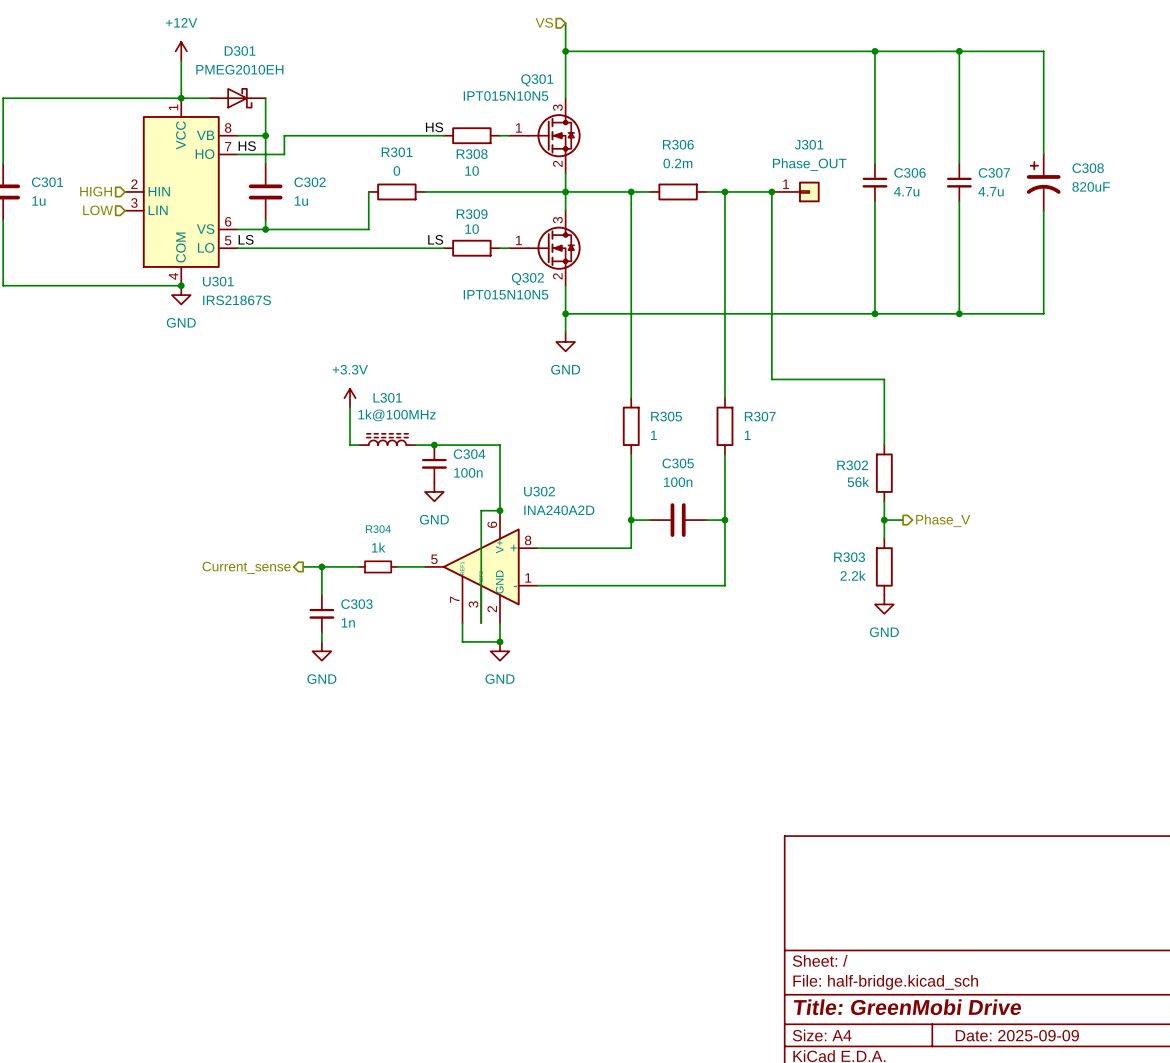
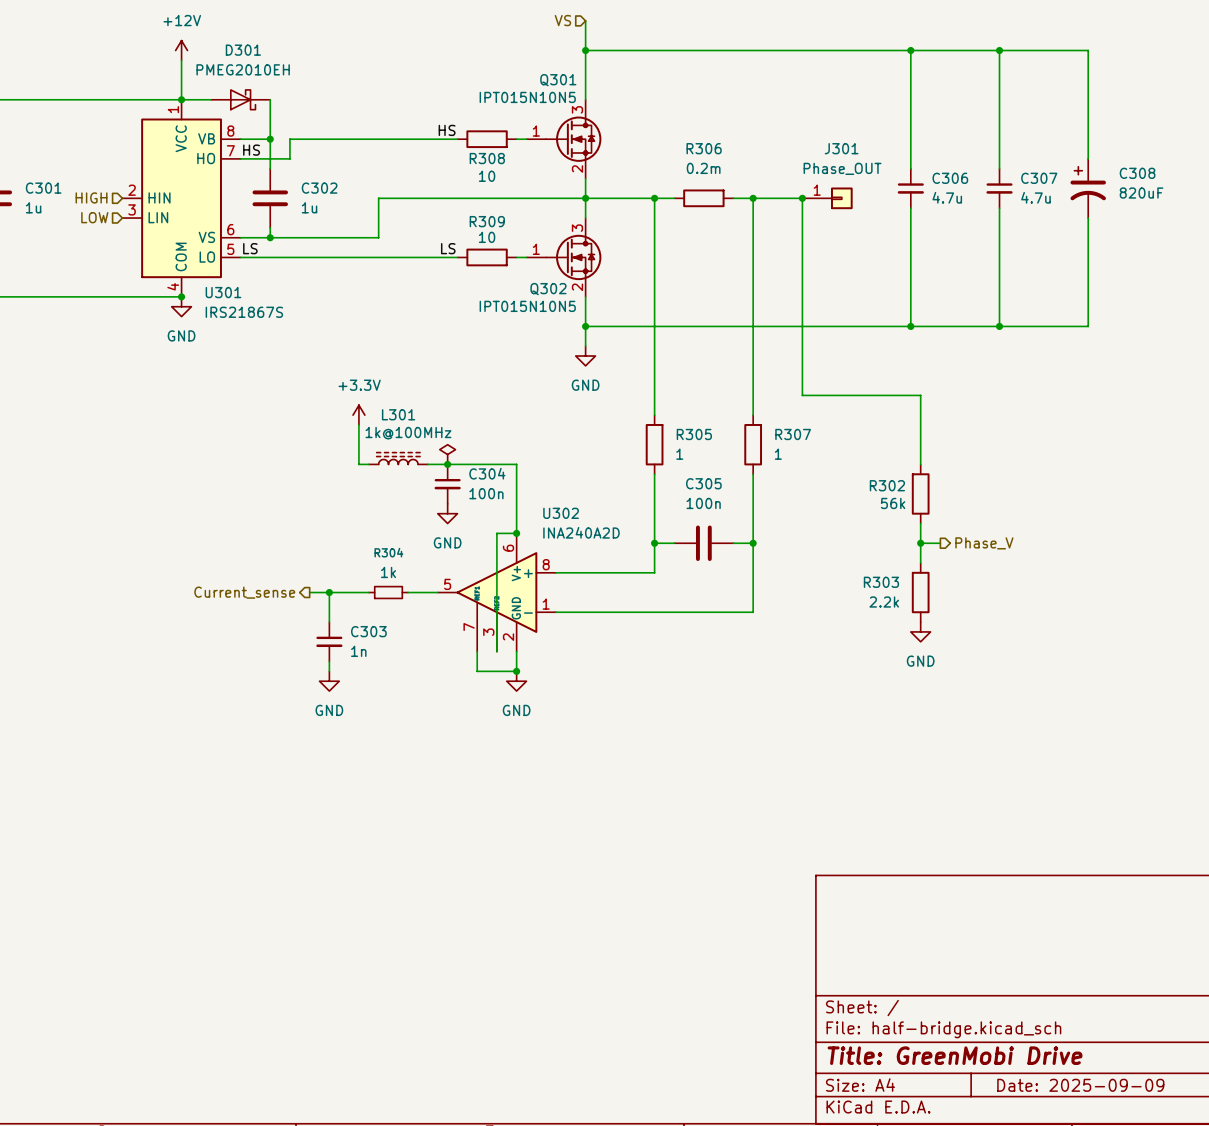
wire: none -> (378, 198) (437, 198)
R301: 0 (396, 191) -> none
power symbol: none -> (447, 454)

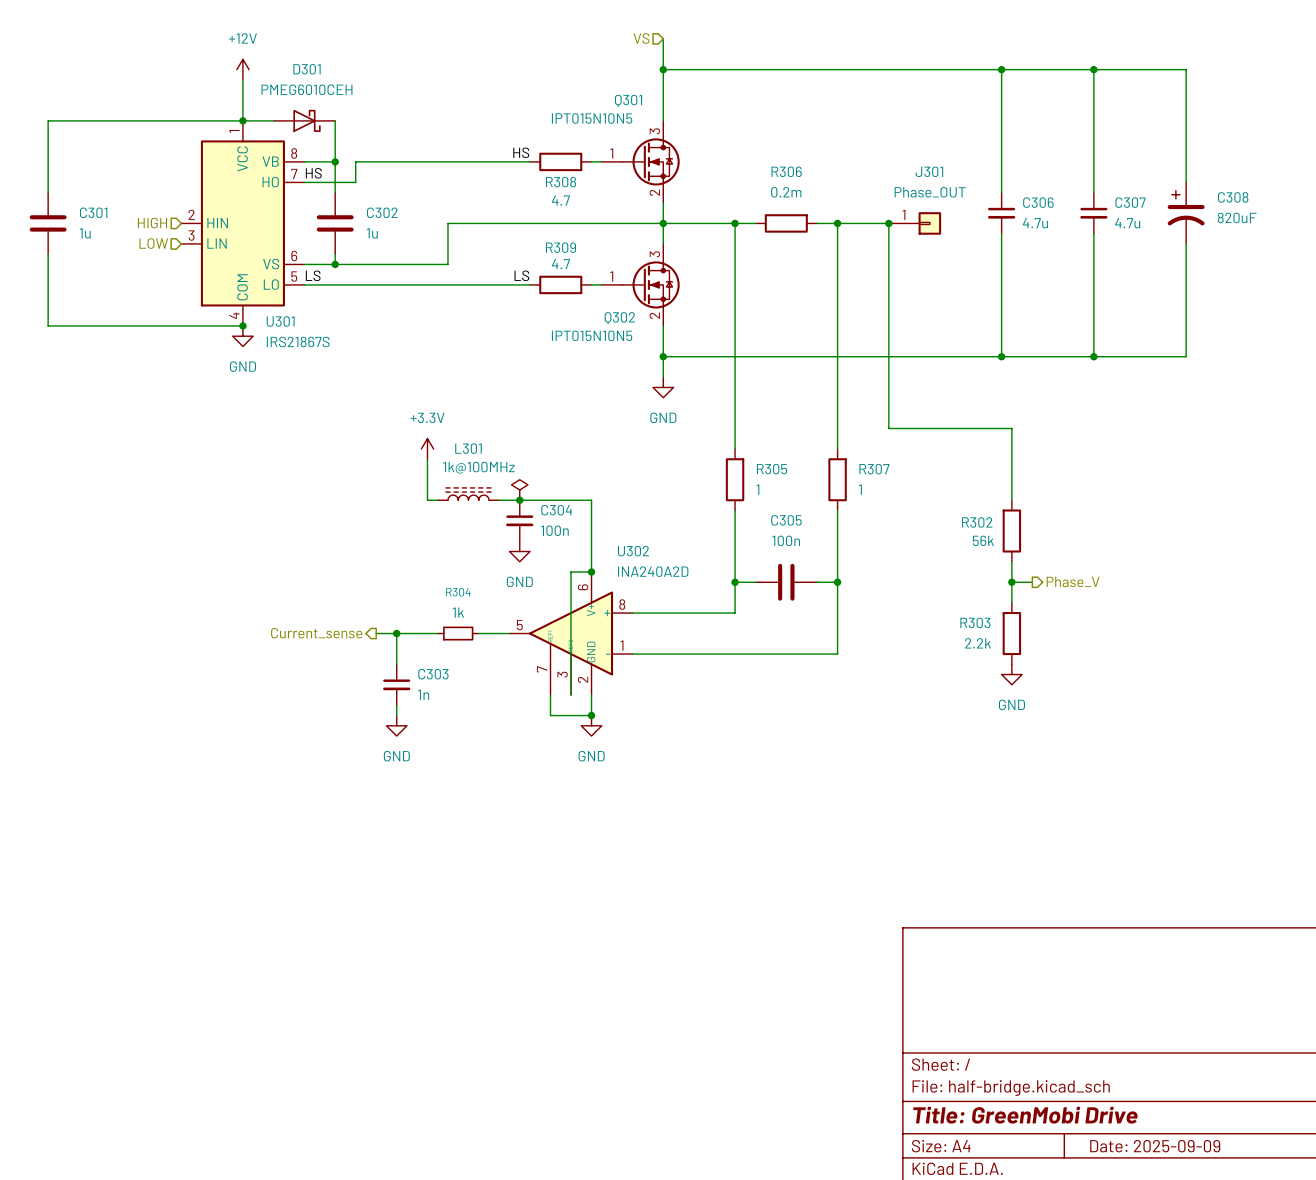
D301 value: PMEG2010EH (243, 69) -> PMEG6010CEH (306, 89)
R308 value: 10 (487, 176) -> 4.7 (560, 200)
R309 value: 10 (487, 237) -> 4.7 (560, 264)

